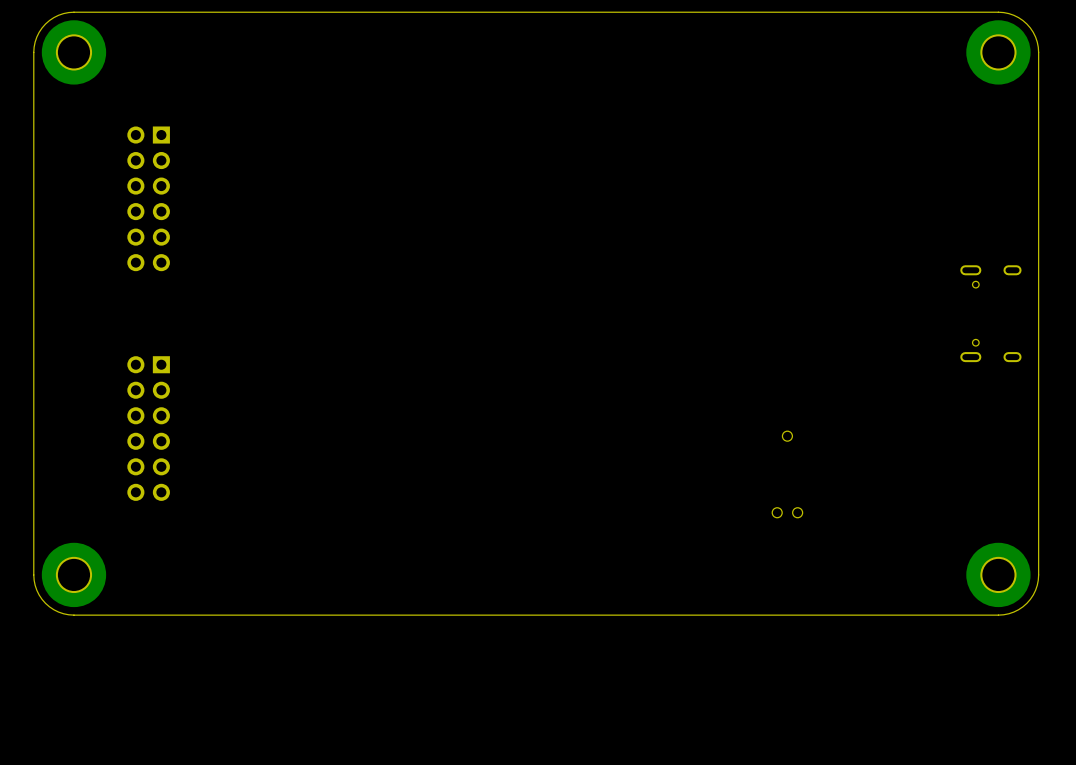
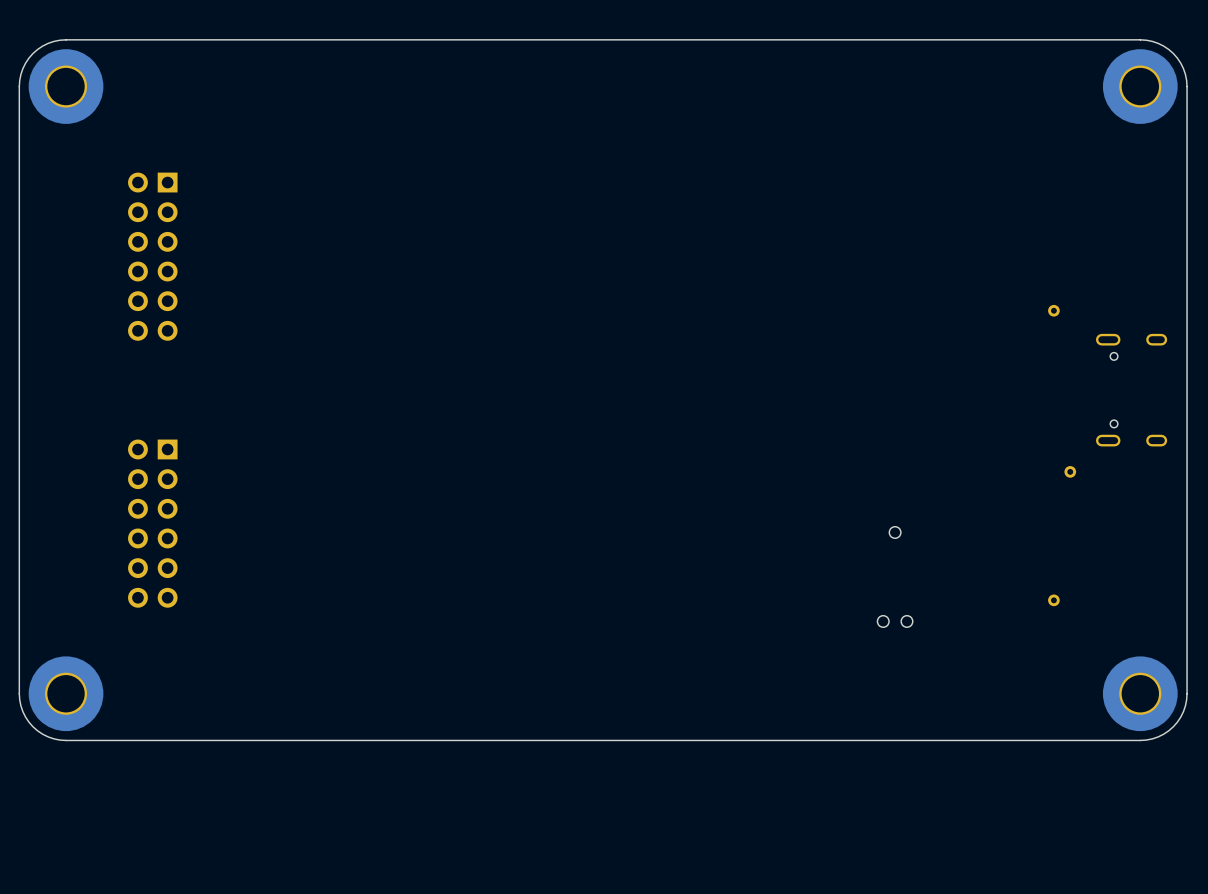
part: none -> (1053, 310)
part: none -> (1070, 471)
part: none -> (1053, 600)

